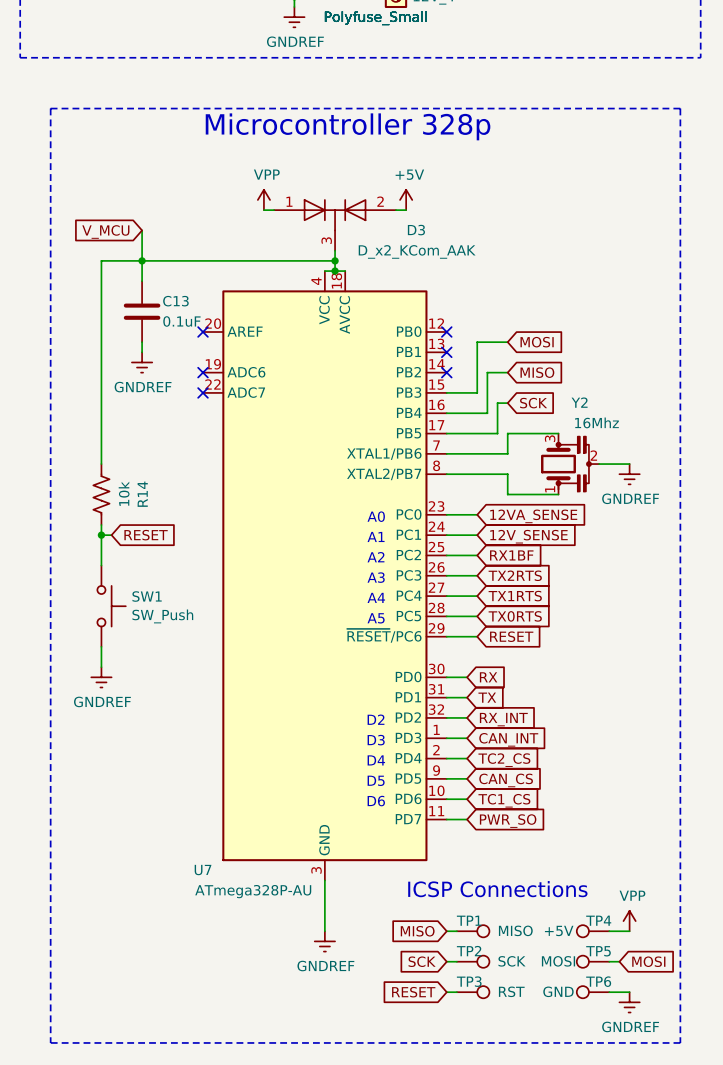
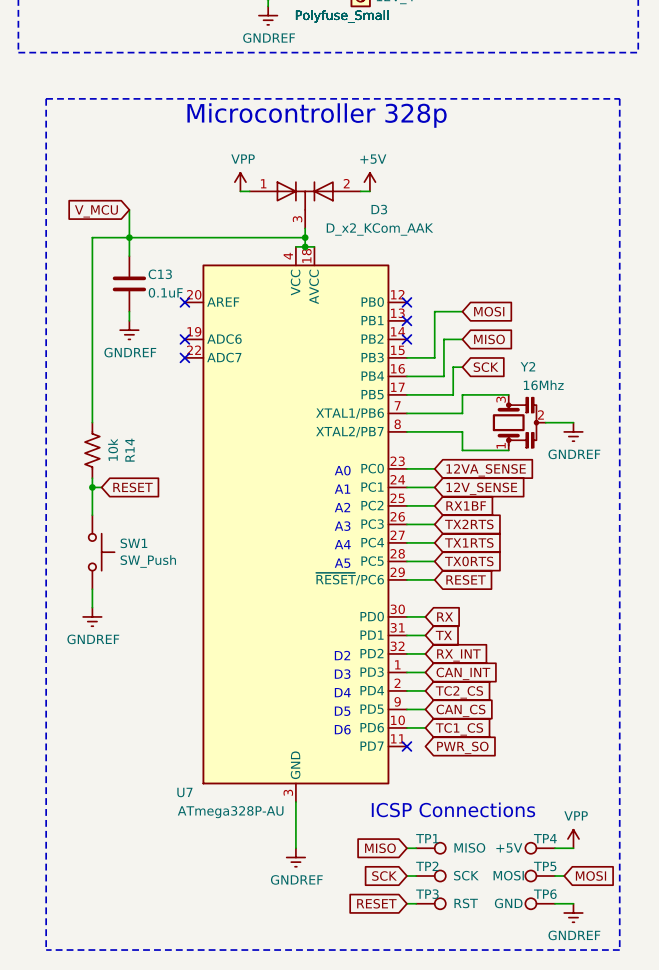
wire: (446, 819) (467, 819) -> none
no-connect mark: none -> (406, 746)

